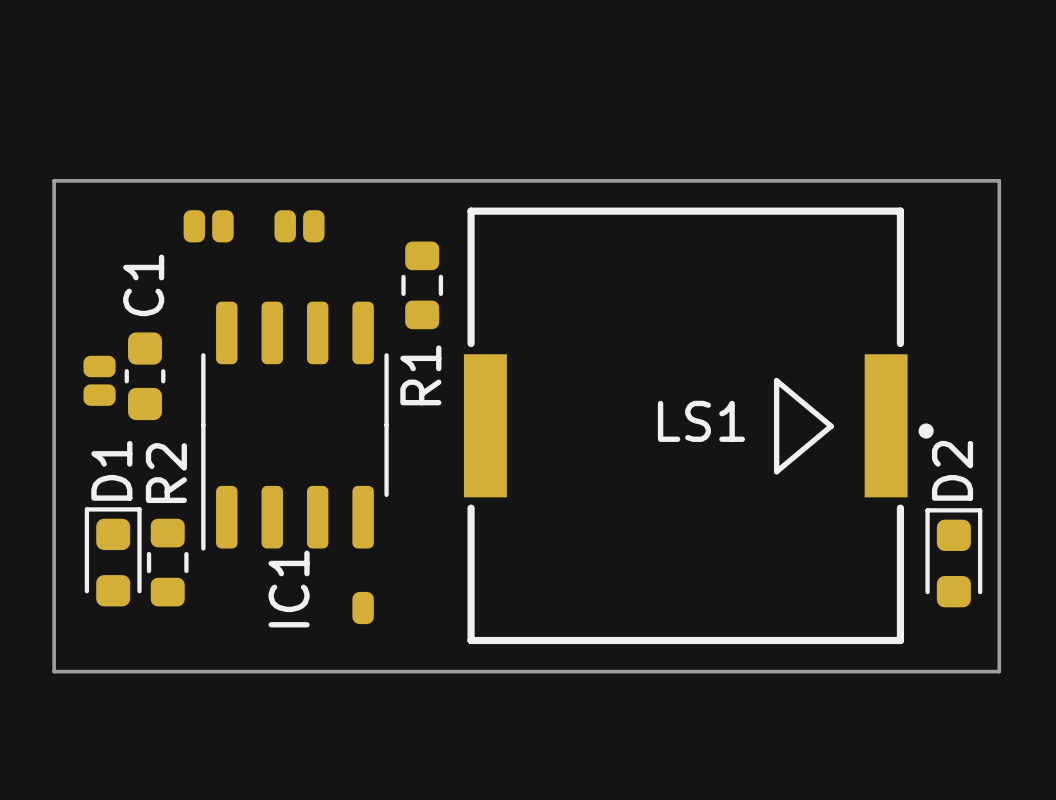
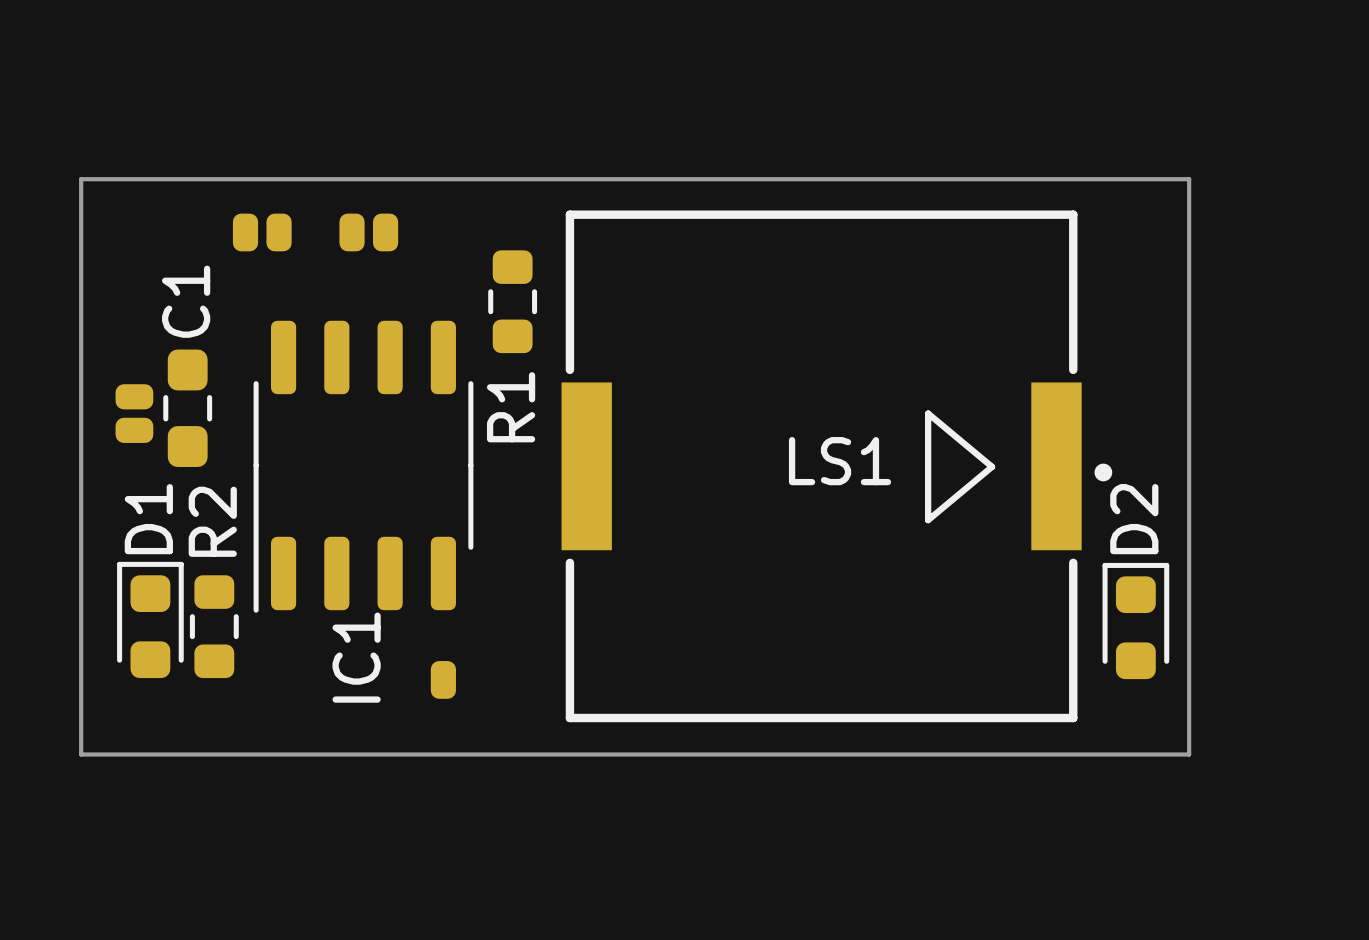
C1 footprint: [124, 332, 166, 421] -> [163, 349, 213, 467]

